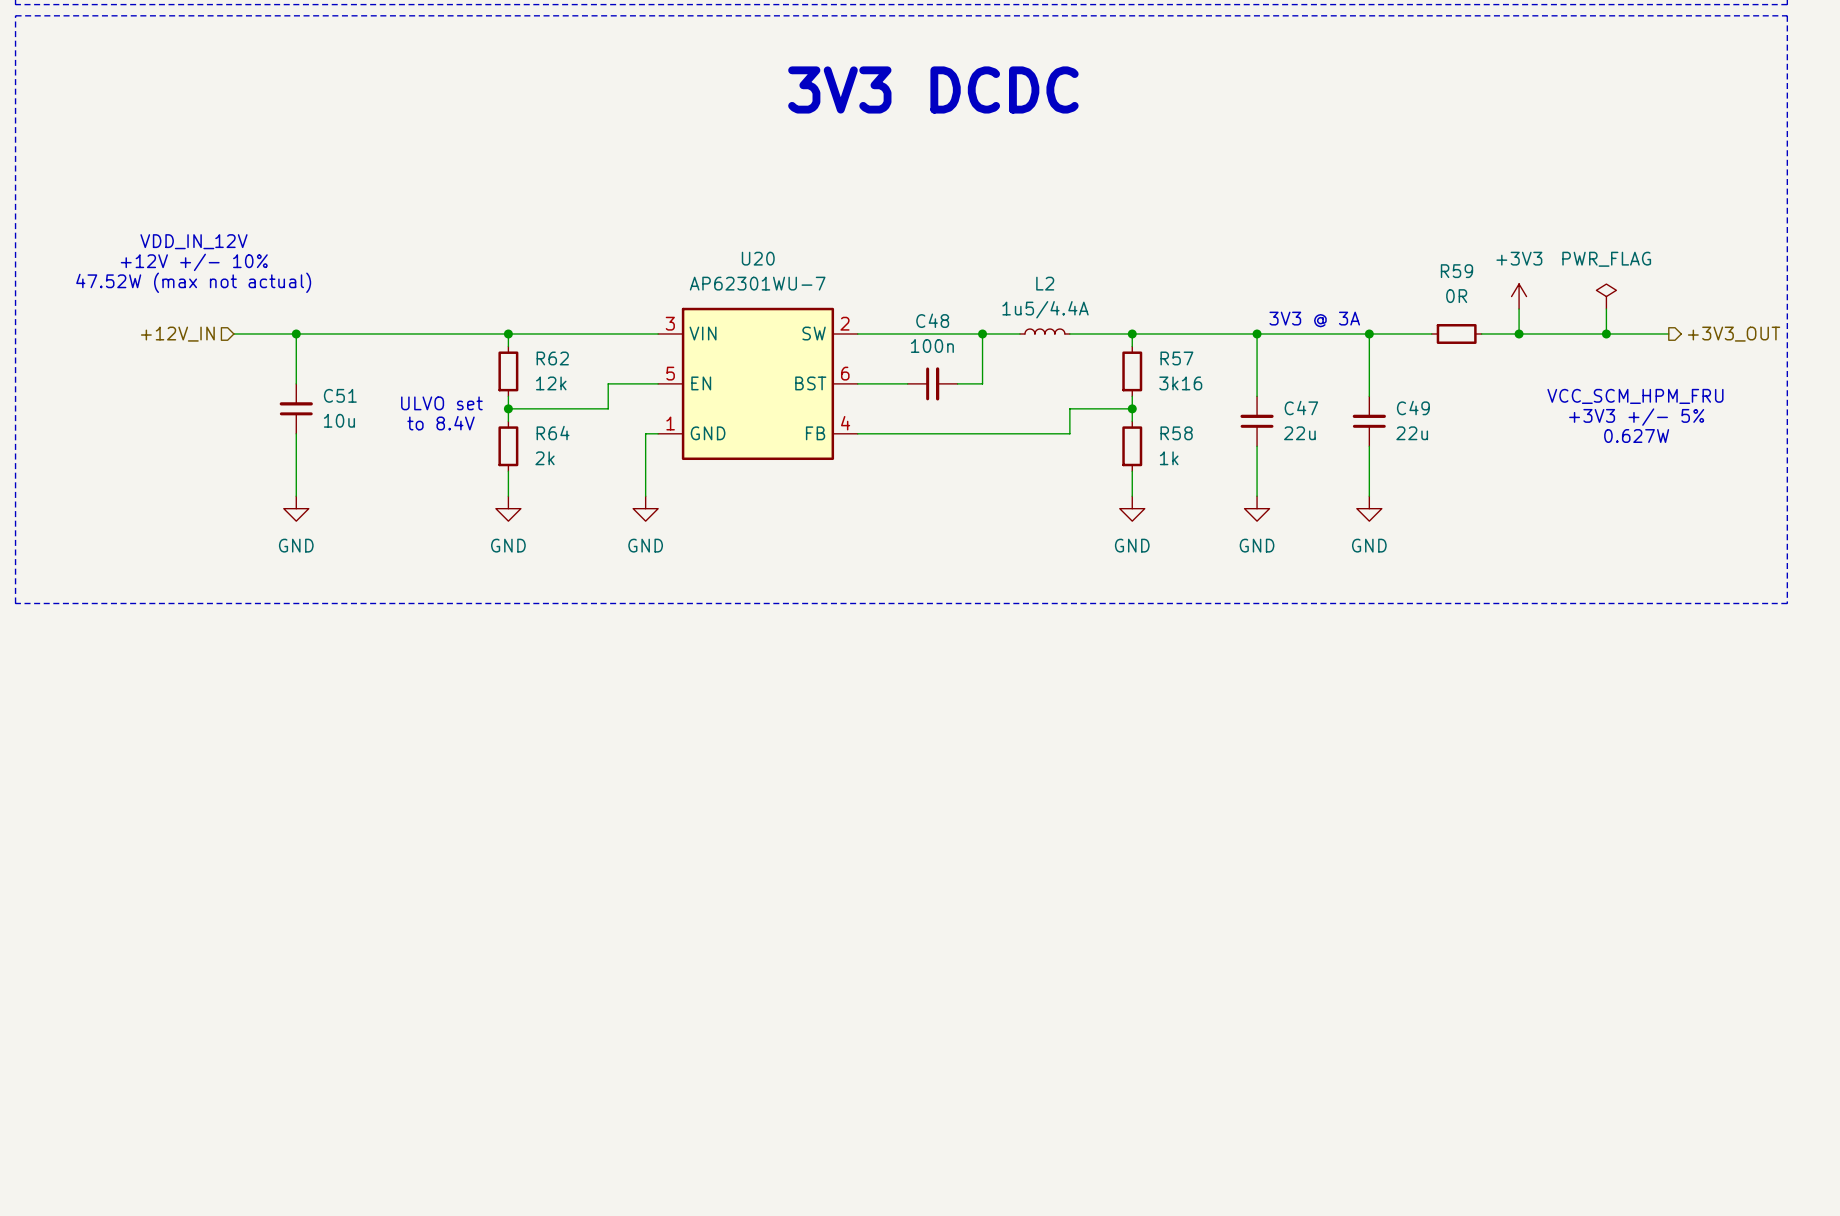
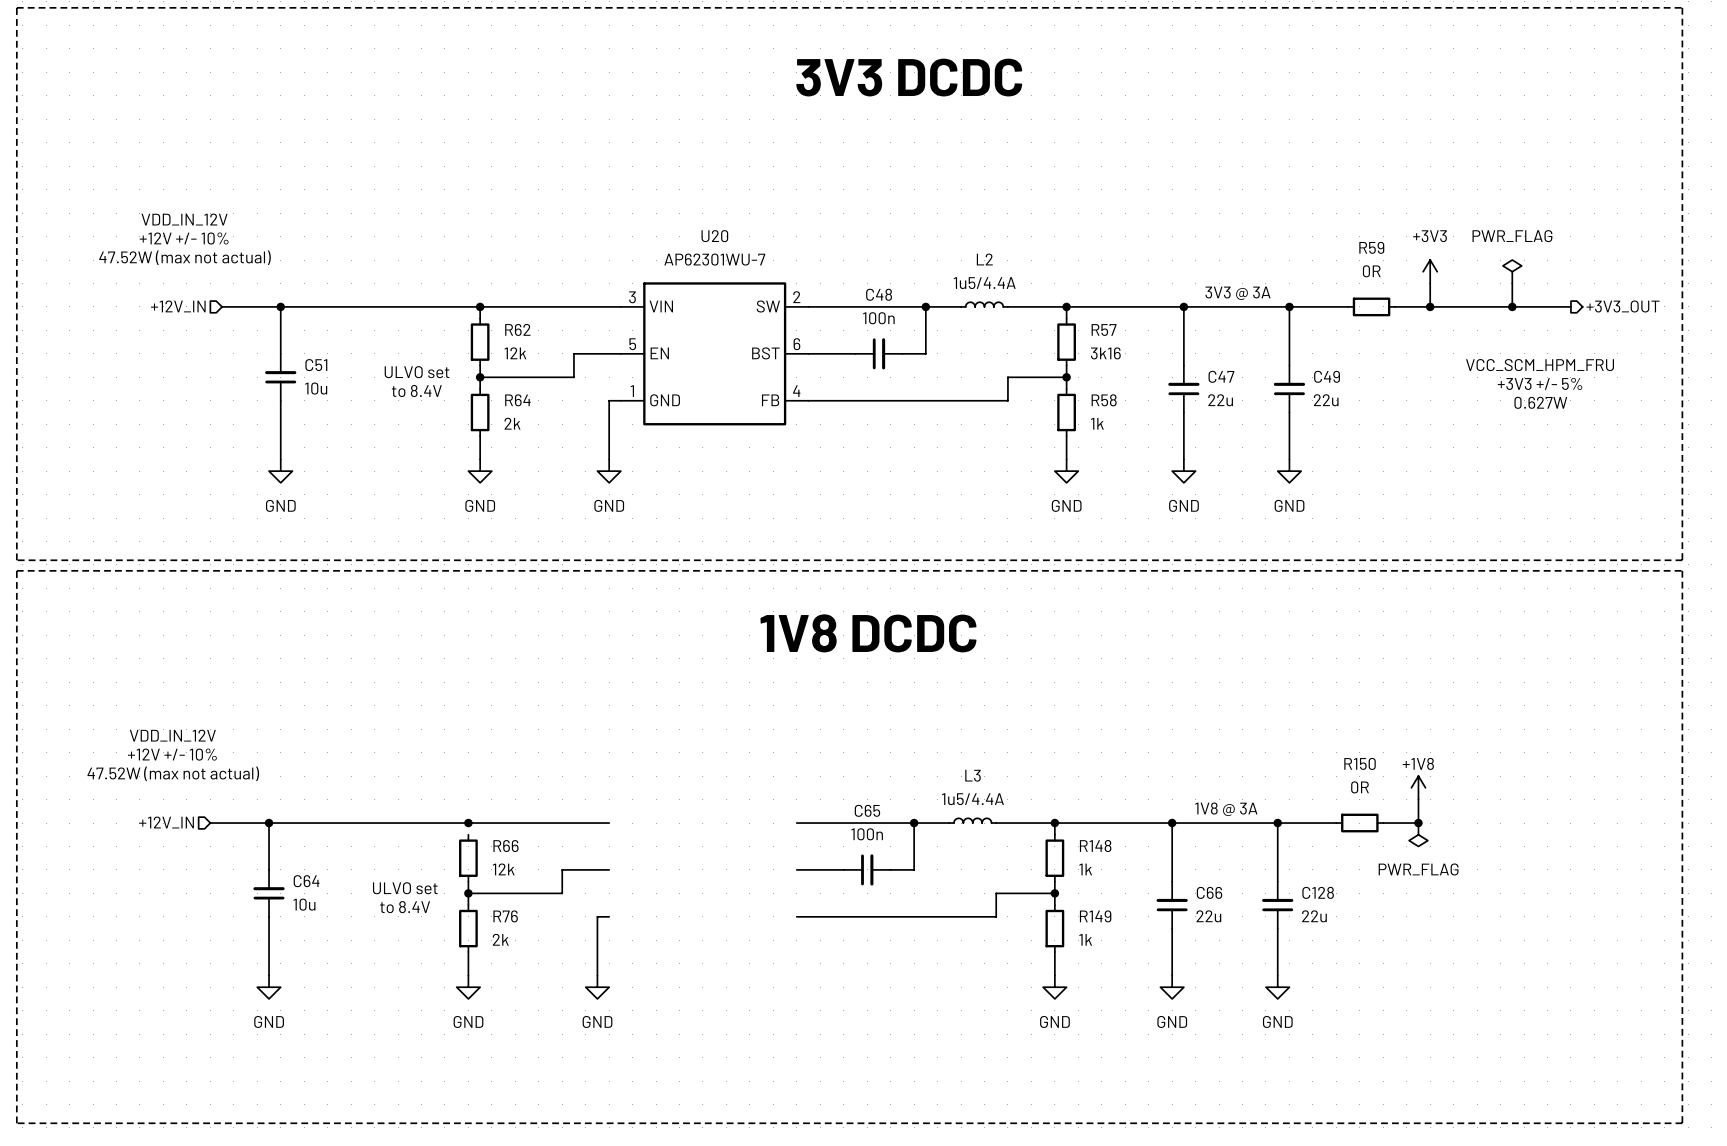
line: none -> (16, 570) (1682, 570) (1682, 1123) (16, 1123) (16, 570)
text: none -> 1V8 DCDC (868, 633)
text: none -> VDD_IN_12V (172, 735)
text: none -> +12V +/- 10% (172, 754)
text: none -> 47.52W (max not actual) (173, 773)
power symbol: none -> +1V8 (1418, 787)
wire: none -> (1418, 799) (1418, 823) (1383, 823)
text: none -> 1V8 @ 3A (1226, 809)
L3: none -> (972, 820)
wire: none -> (210, 823) (609, 823)
wire: none -> (269, 823) (269, 869)
junction: none -> (269, 823)
junction: none -> (468, 823)
wire: none -> (796, 823) (949, 823)
wire: none -> (914, 823) (914, 869) (890, 869)
junction: none -> (914, 823)
wire: none -> (996, 823) (1336, 823)
wire: none -> (1054, 823) (1054, 834)
junction: none -> (1054, 823)
wire: none -> (1172, 823) (1172, 881)
junction: none -> (1172, 823)
wire: none -> (1277, 823) (1277, 881)
junction: none -> (1277, 823)
R150: none -> (1359, 823)
junction: none -> (1418, 823)
hierarchical label: none -> +12V_IN (166, 822)
power symbol: none -> PWR_FLAG (1418, 834)
R66: none -> (468, 858)
R148: none -> (1054, 858)
wire: none -> (609, 869) (562, 869) (562, 893) (468, 893)
wire: none -> (796, 869) (843, 869)
C65: none -> (867, 869)
wire: none -> (468, 881) (468, 905)
wire: none -> (1054, 881) (1054, 905)
text: none -> ULVO set (405, 888)
C64: none -> (269, 893)
junction: none -> (468, 893)
wire: none -> (1054, 893) (996, 893) (996, 916) (796, 916)
junction: none -> (1054, 893)
C66: none -> (1172, 905)
C128: none -> (1277, 905)
text: none -> to 8.4V (405, 907)
wire: none -> (269, 916) (269, 975)
wire: none -> (609, 916) (597, 916) (597, 975)
R76: none -> (468, 928)
R149: none -> (1054, 928)
wire: none -> (1172, 928) (1172, 975)
wire: none -> (1277, 928) (1277, 975)
wire: none -> (468, 952) (468, 975)
wire: none -> (1054, 952) (1054, 975)
power symbol: none -> GND (269, 987)
power symbol: none -> GND (468, 987)
power symbol: none -> GND (597, 987)
power symbol: none -> GND (1054, 987)
power symbol: none -> GND (1172, 987)
power symbol: none -> GND (1277, 987)

